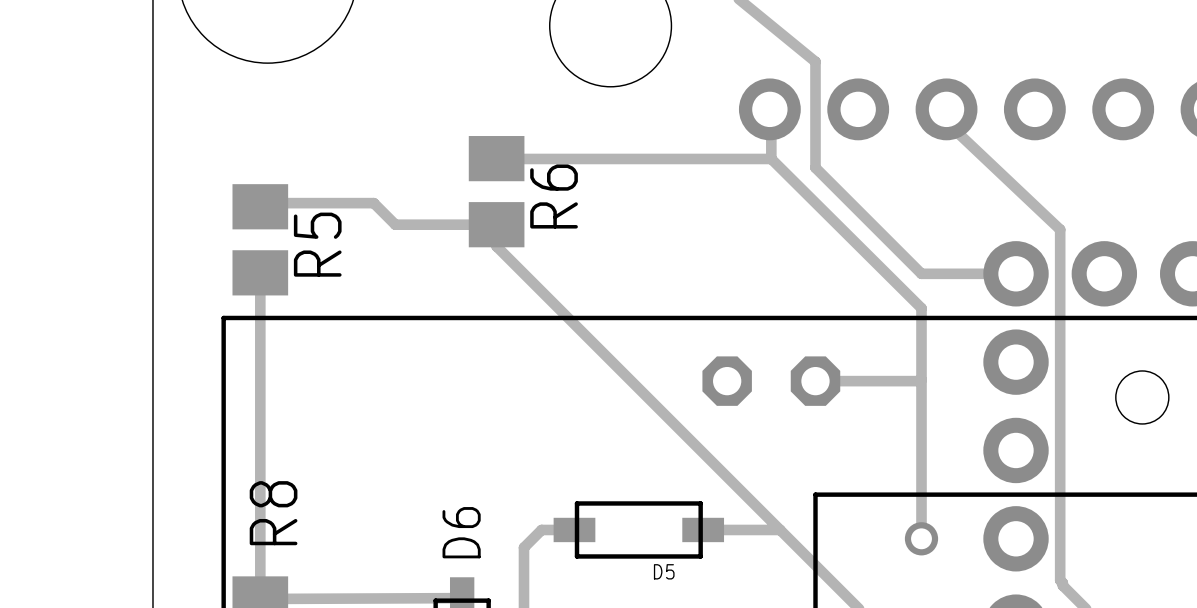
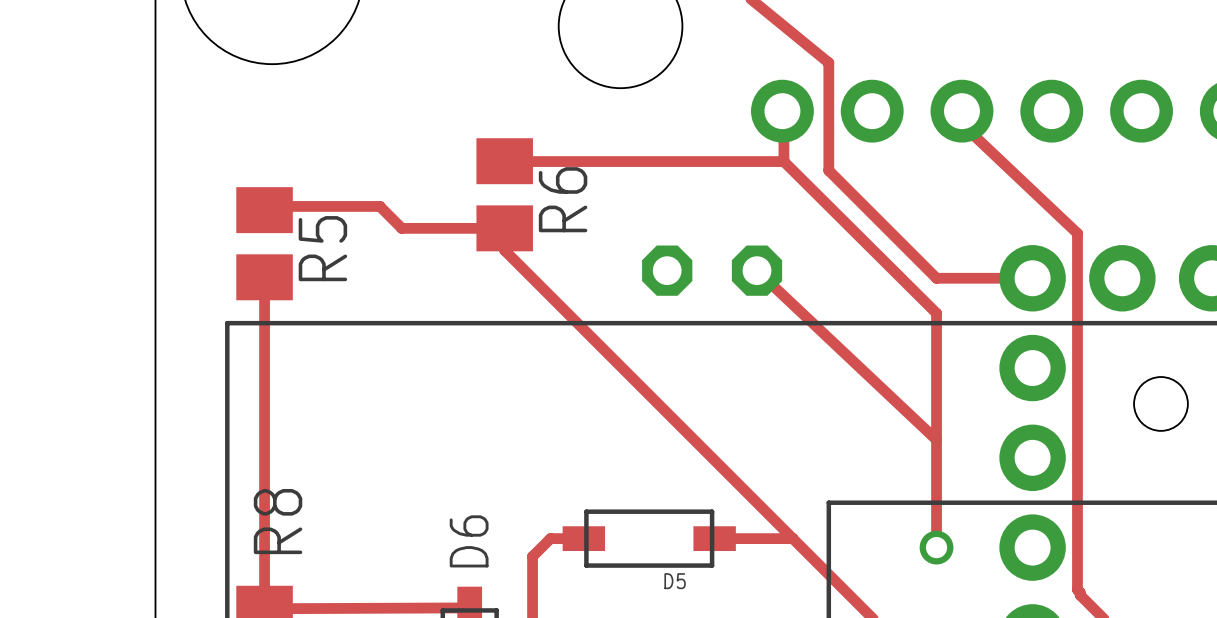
track: none -> (756, 270) (936, 439)
track: (921, 379) (815, 381) -> none
part position: (771, 381) -> (712, 270)

